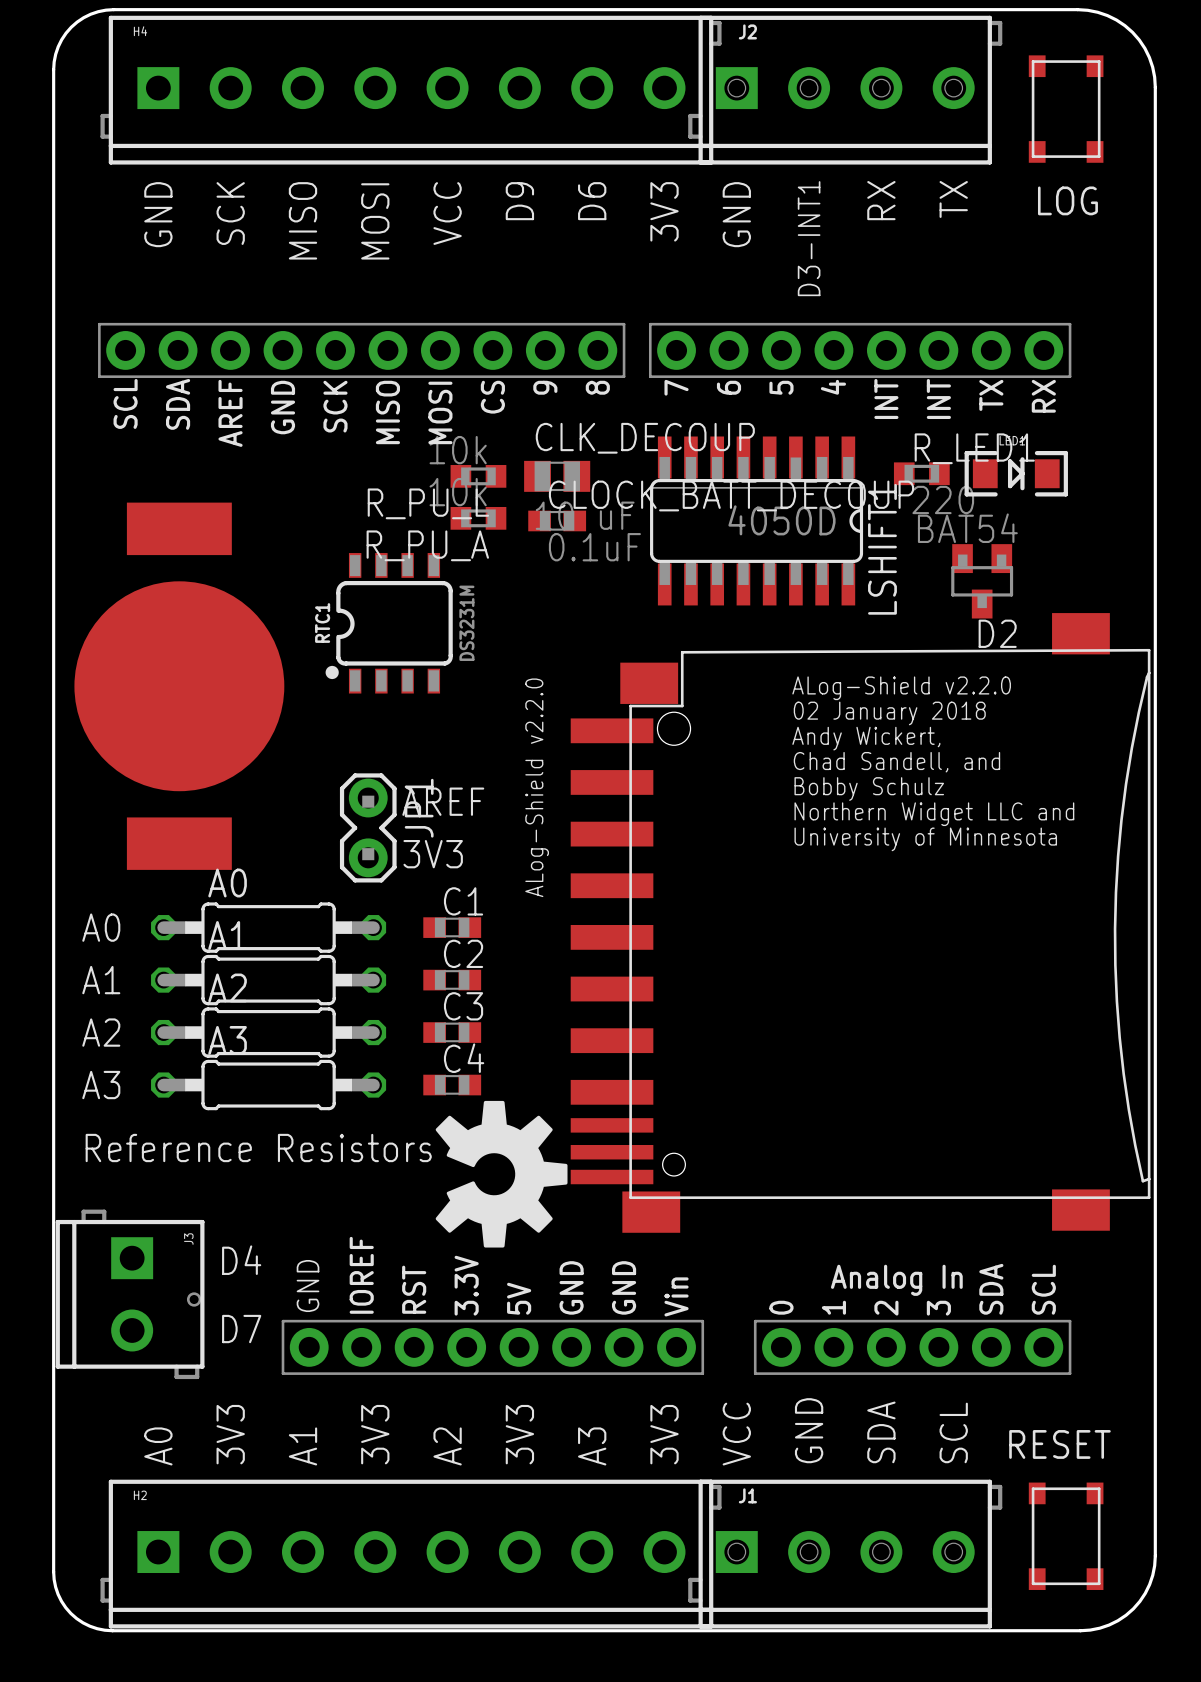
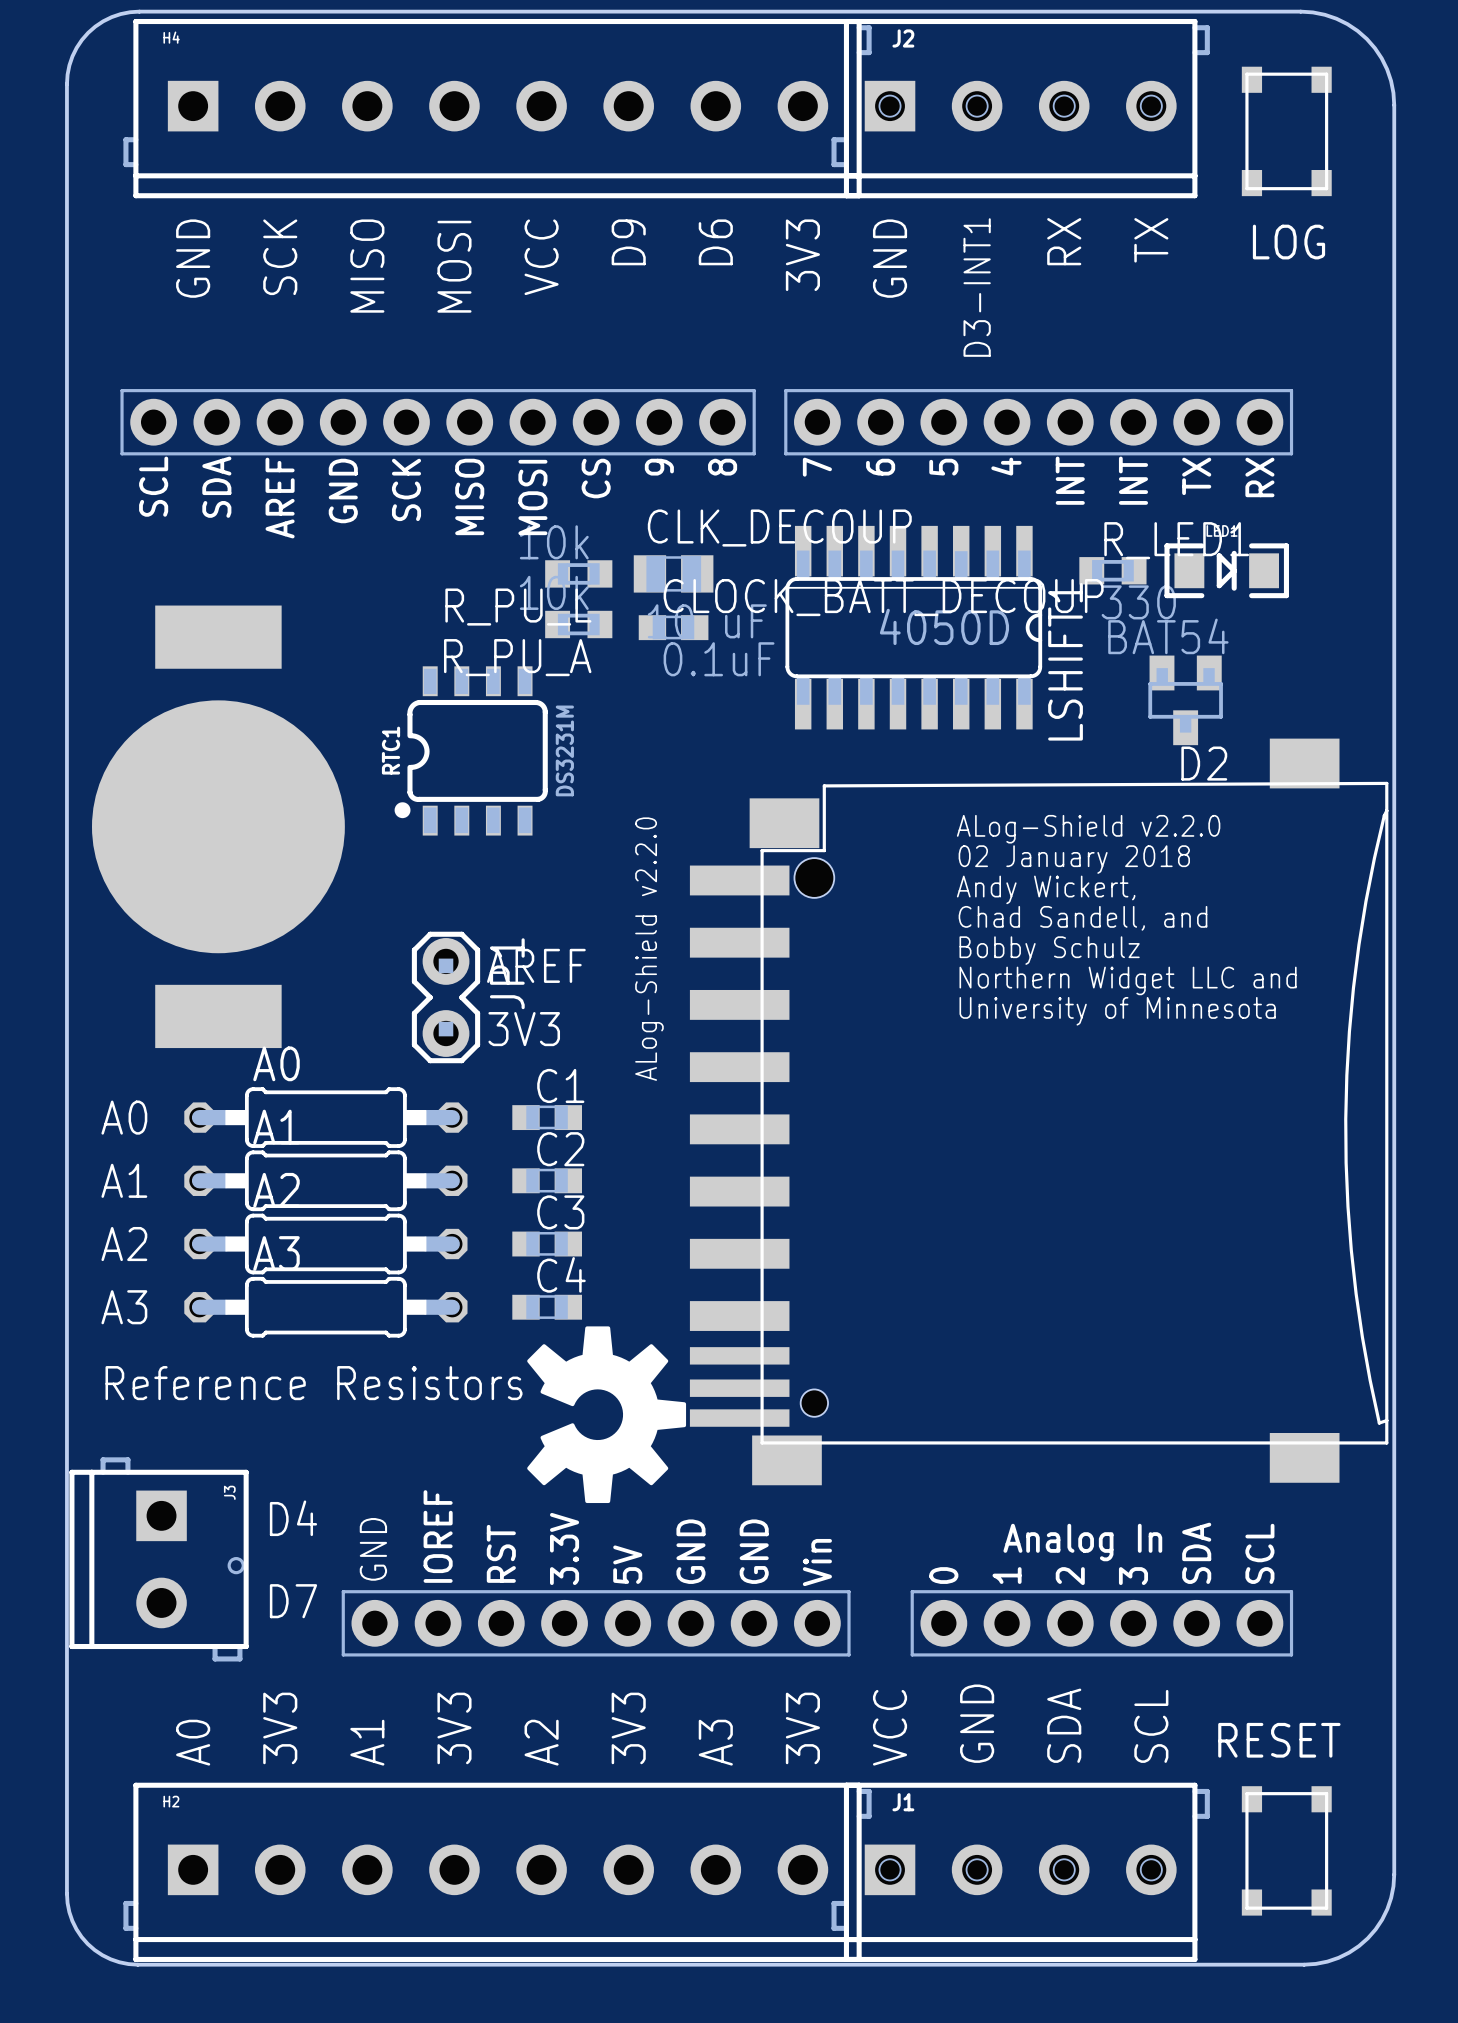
R_LED1 value: 220 (943, 499) -> 330 (1138, 602)

